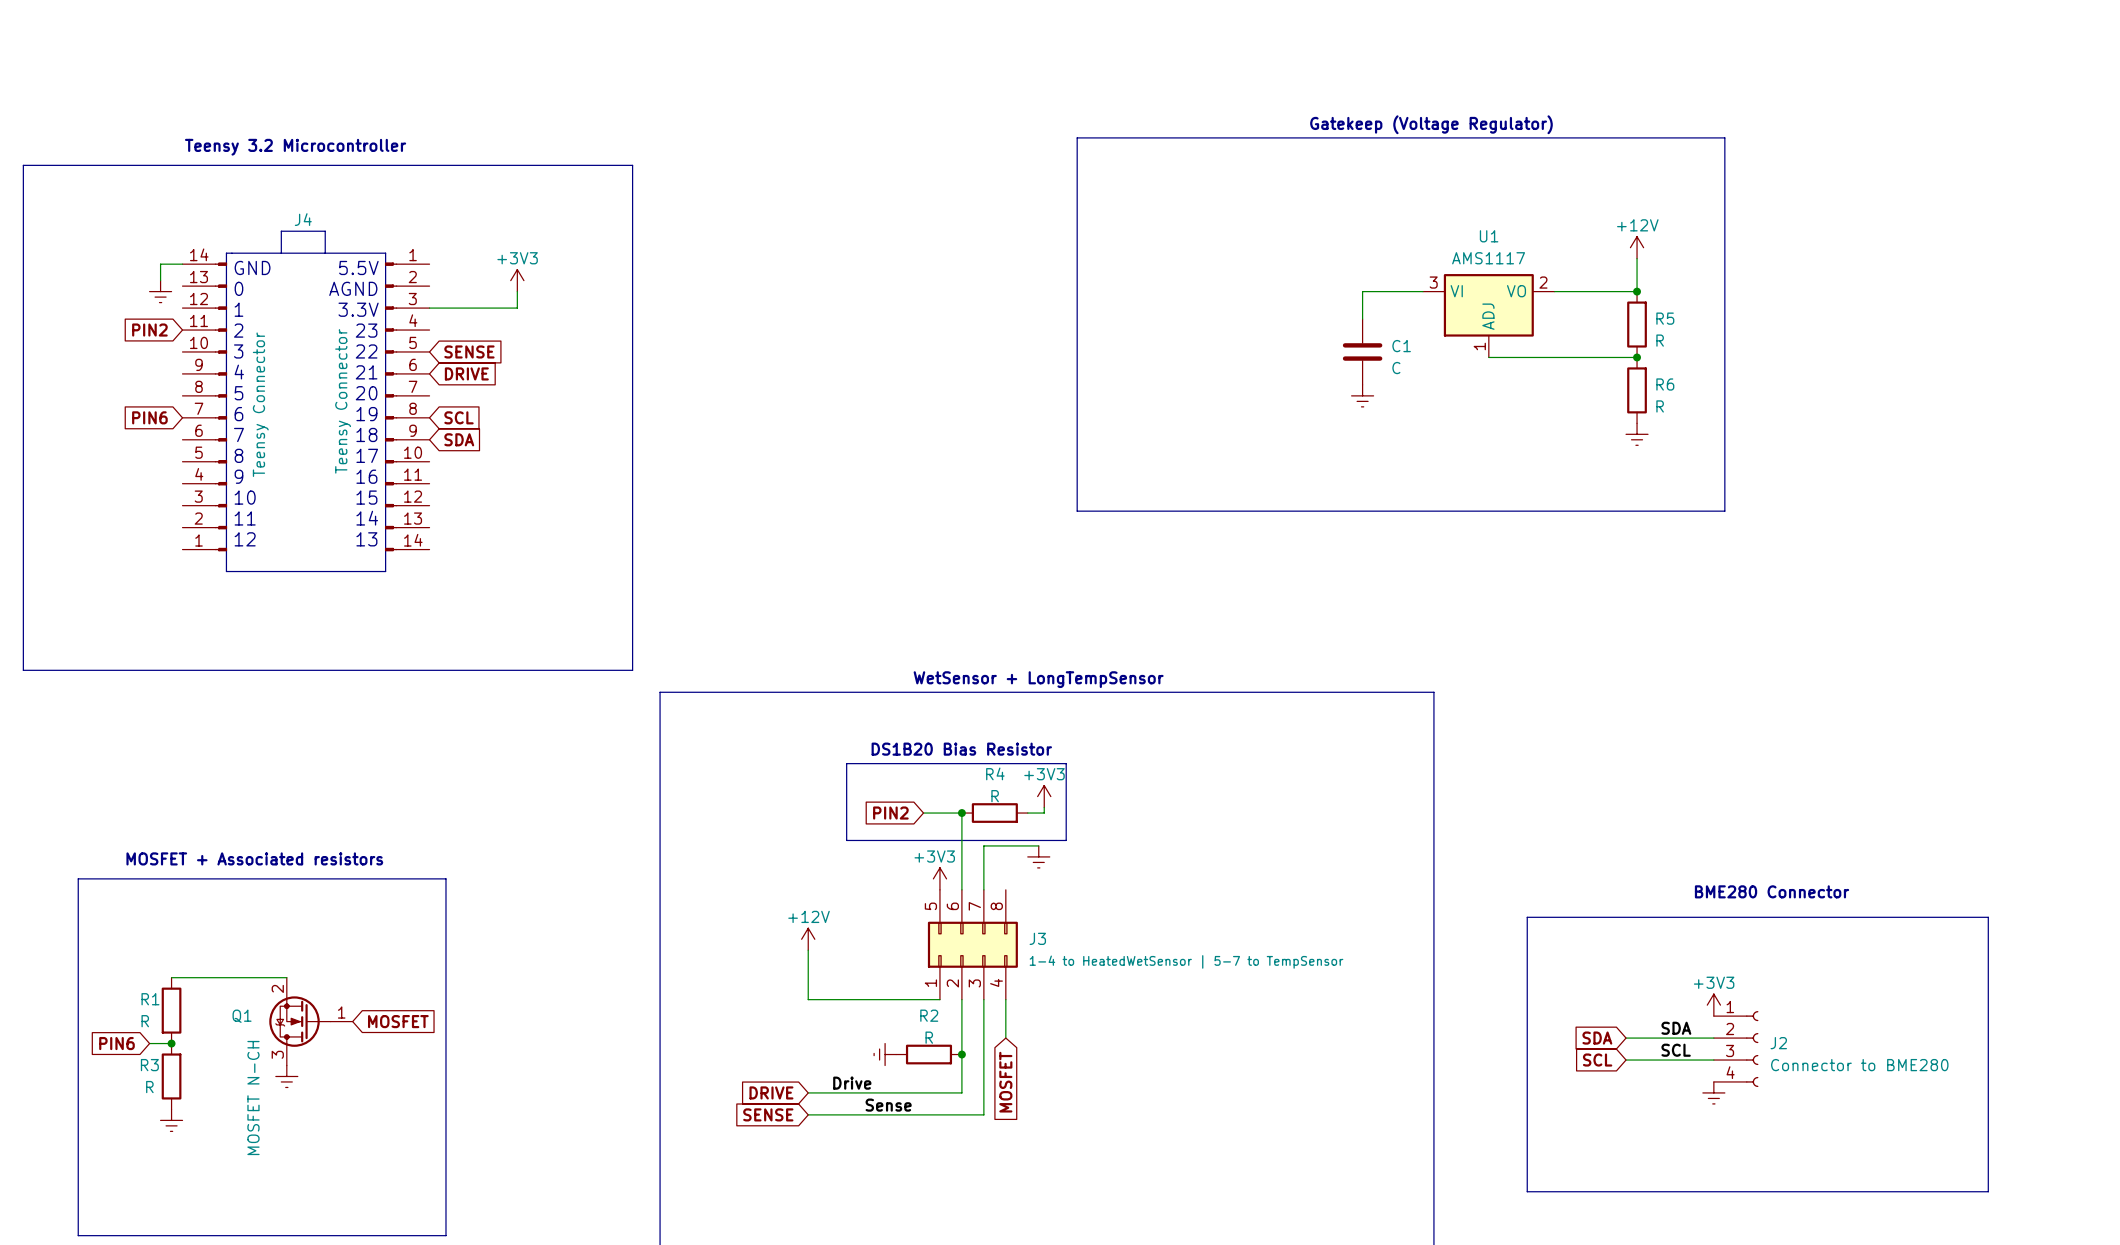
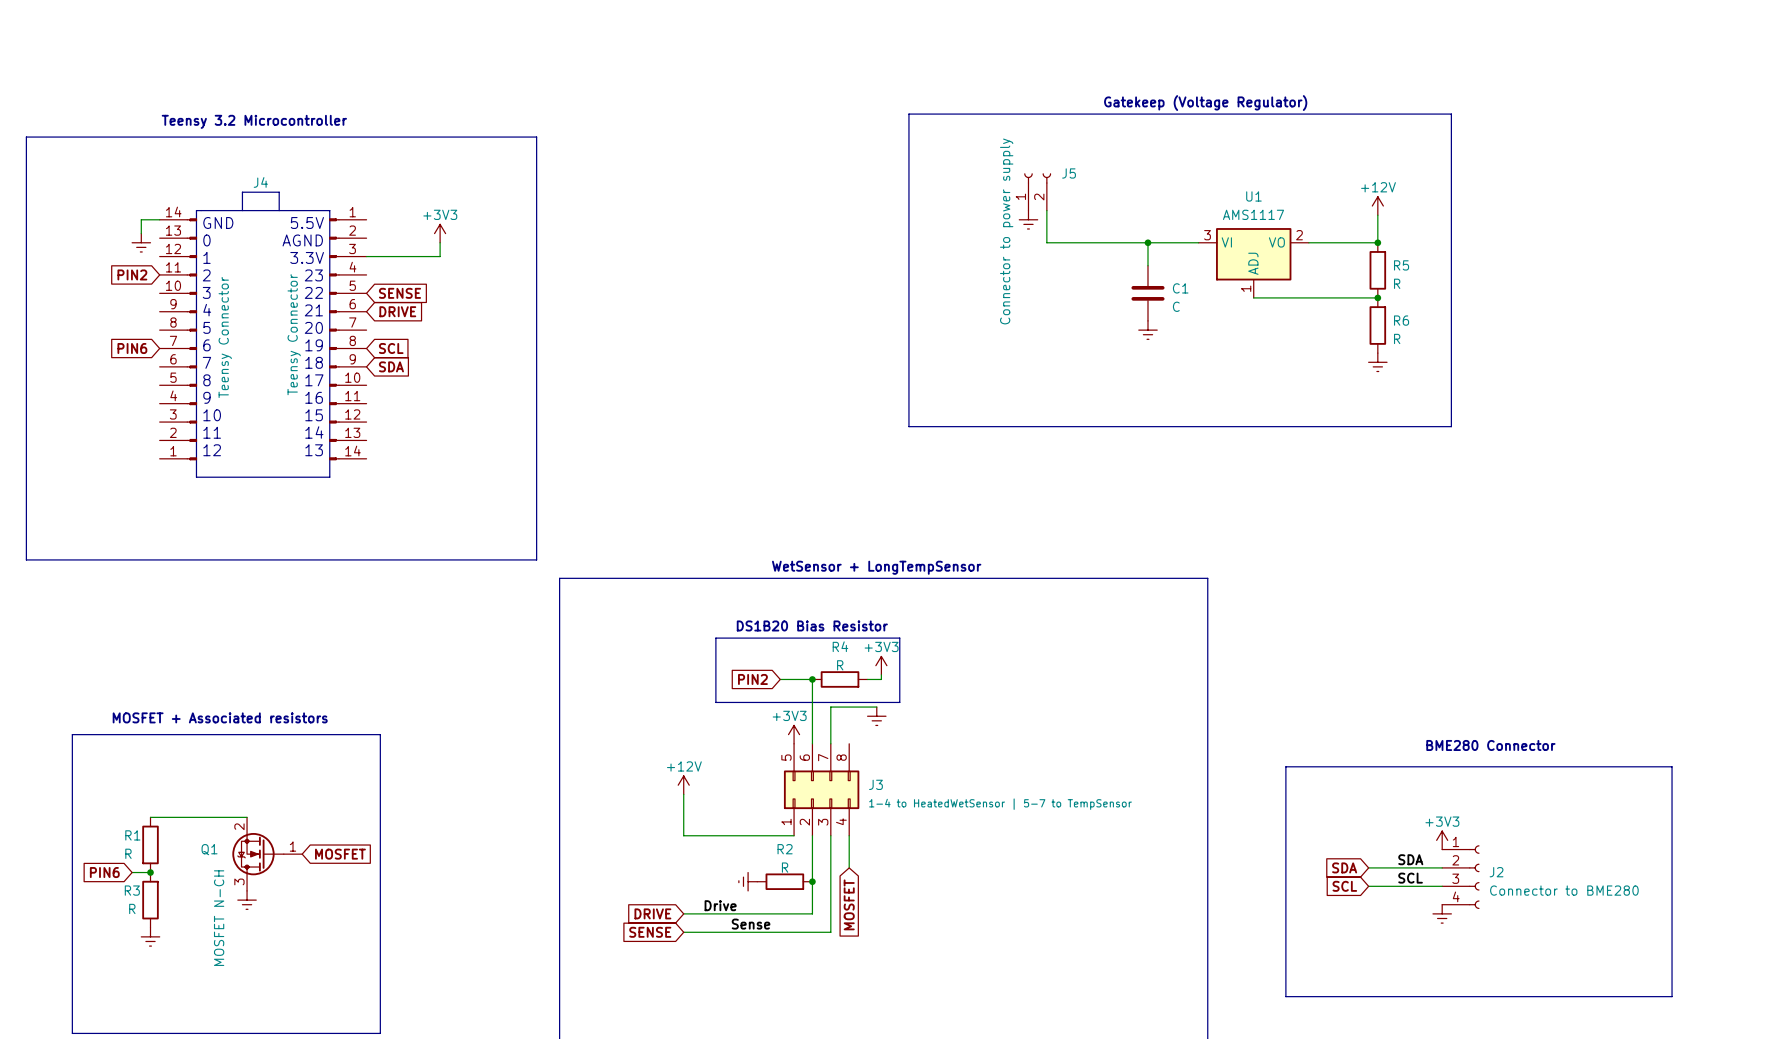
J5: none -> Connector to power supply (1037, 191)
wire: none -> (1046, 210) (1046, 242) (1147, 242)
power symbol: none -> (1028, 219)
junction: none -> (1147, 242)

